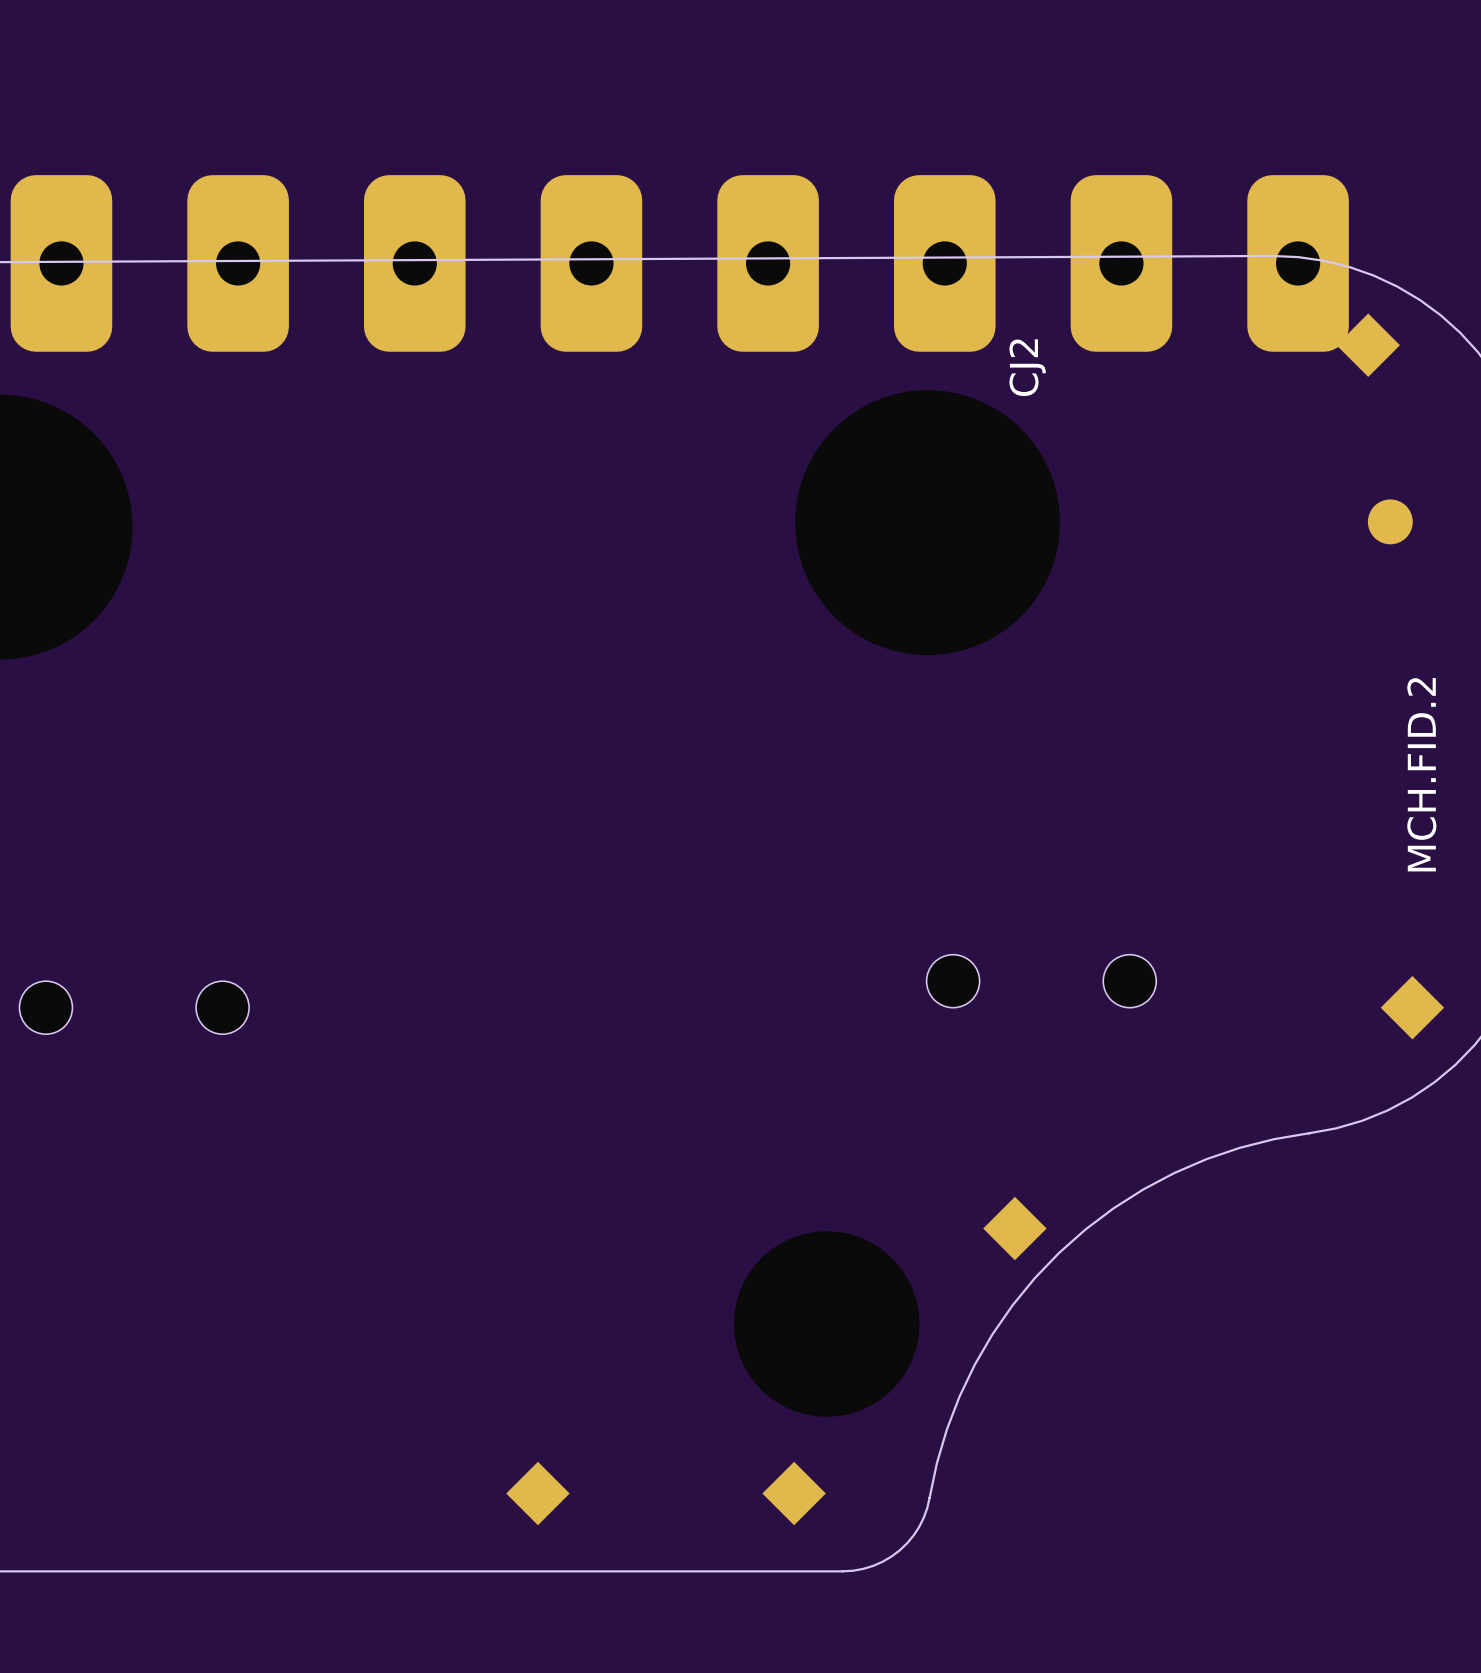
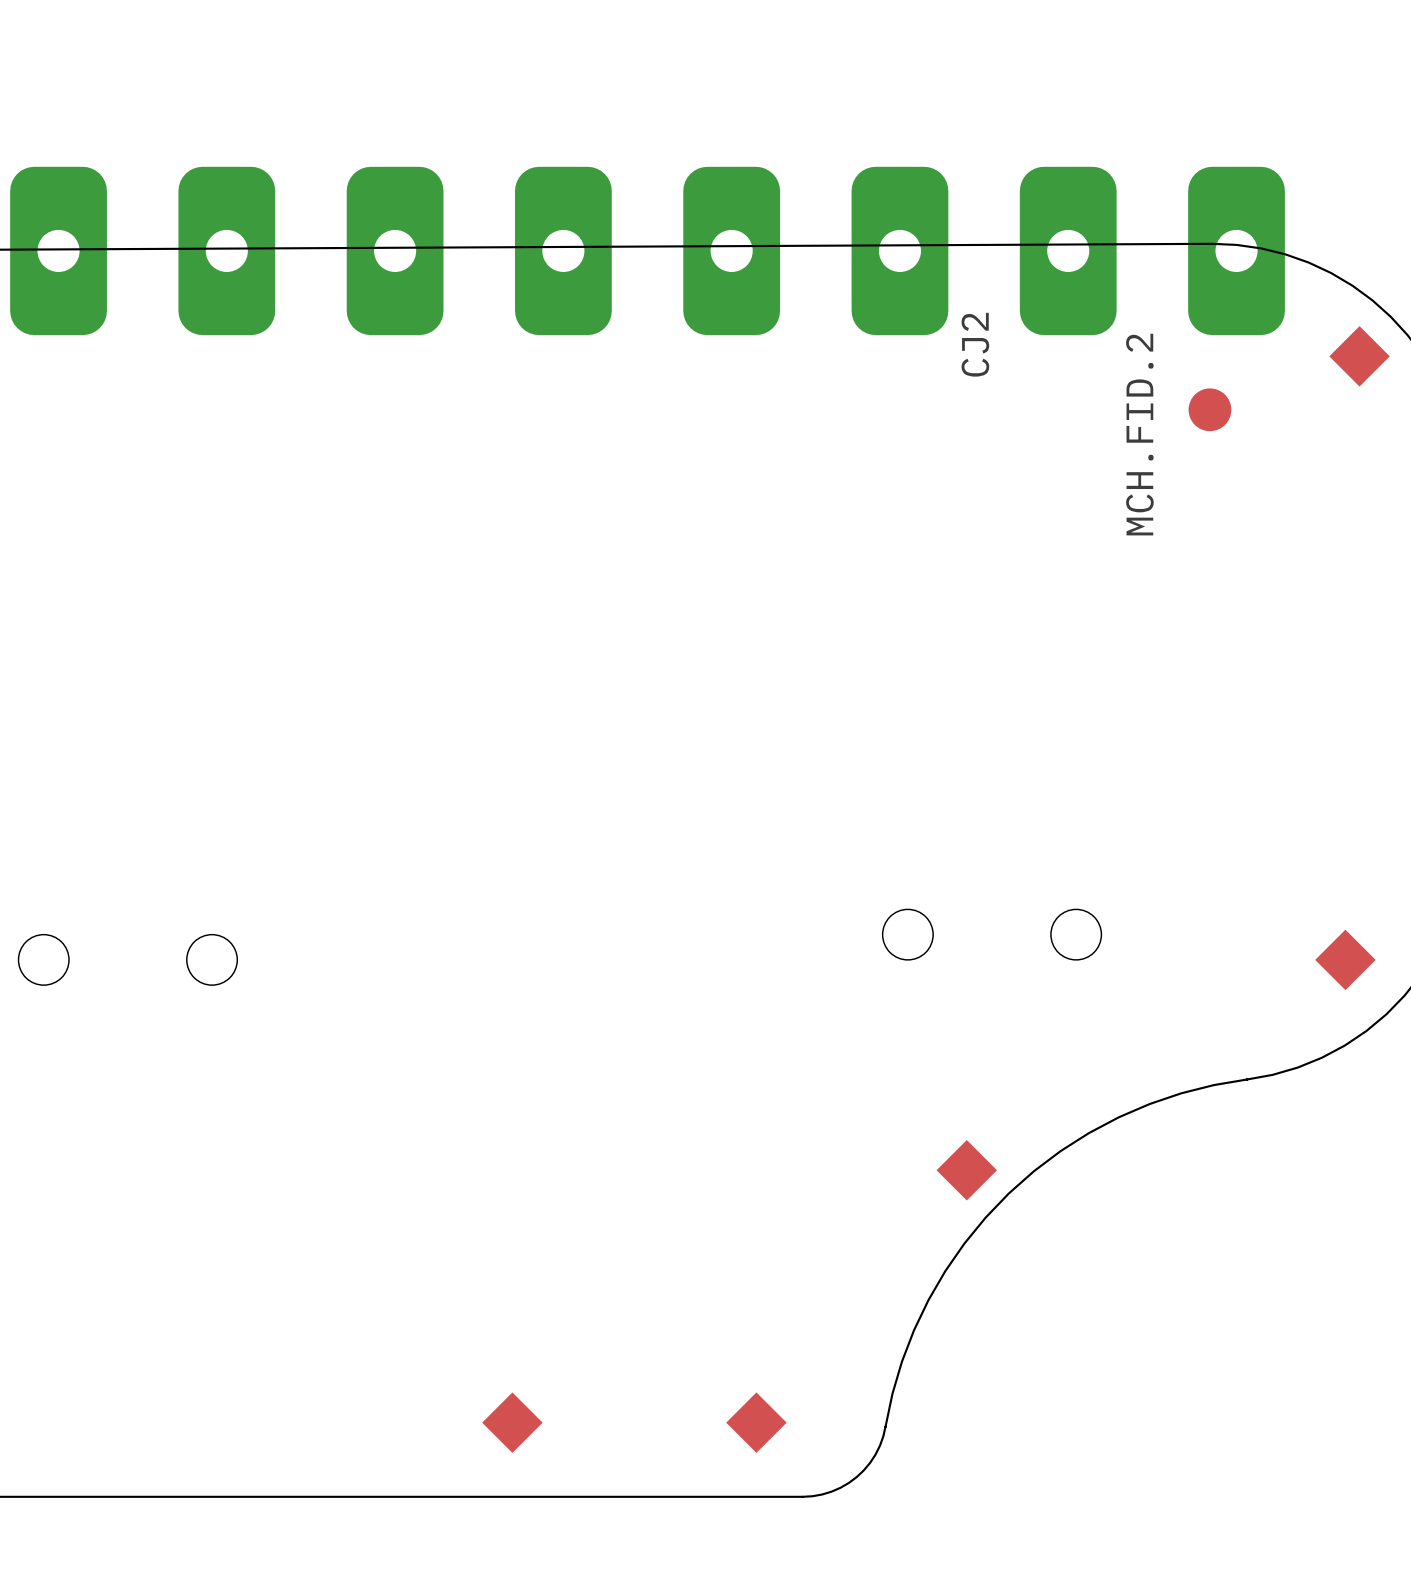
part position: (1368, 345) -> (1359, 356)
MCH.FID.2 position: (1390, 521) -> (1209, 409)
MCH.FID.2 name position: MCH.FID.2 (1421, 774) -> MCH.FID.2 (1139, 434)

